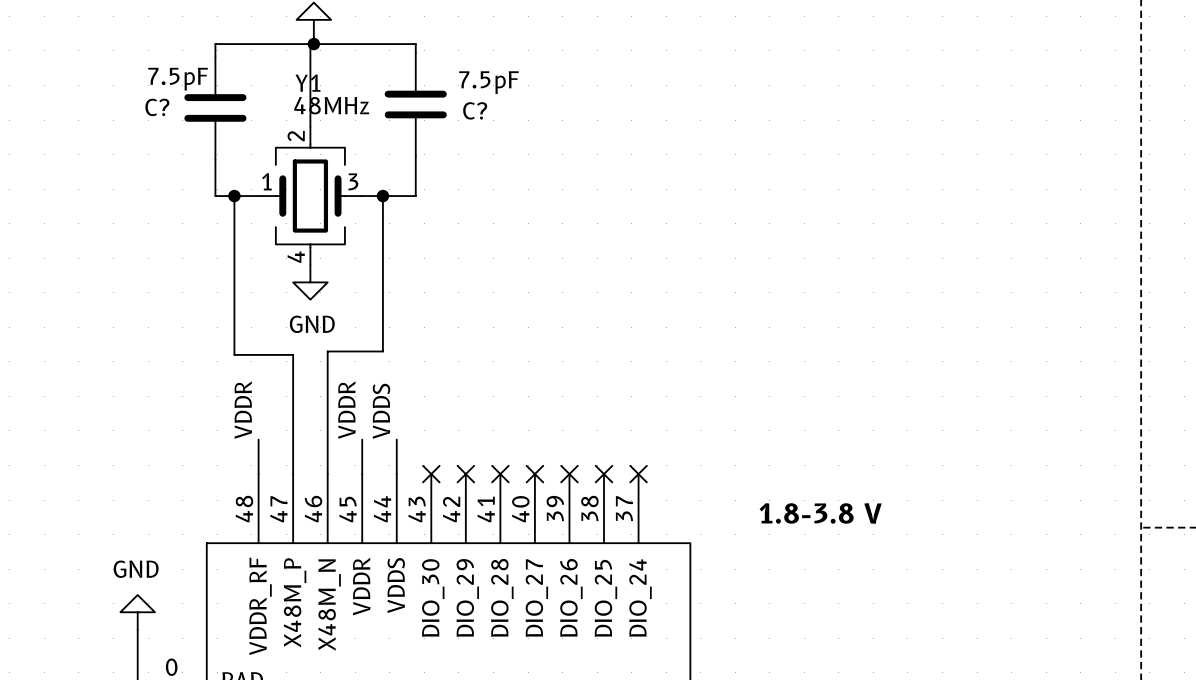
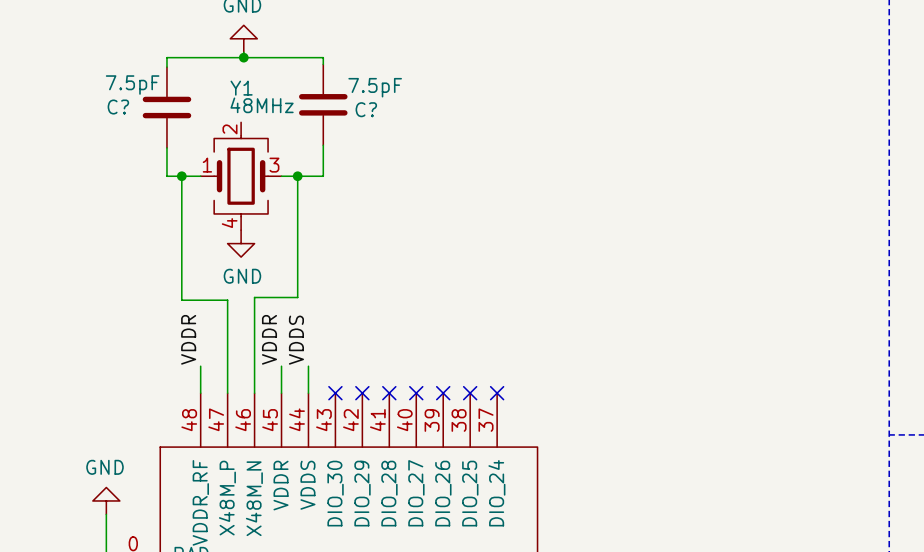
wire: (310, 44) (310, 126) -> none
text: 1.8-3.8 V (820, 513) -> none

